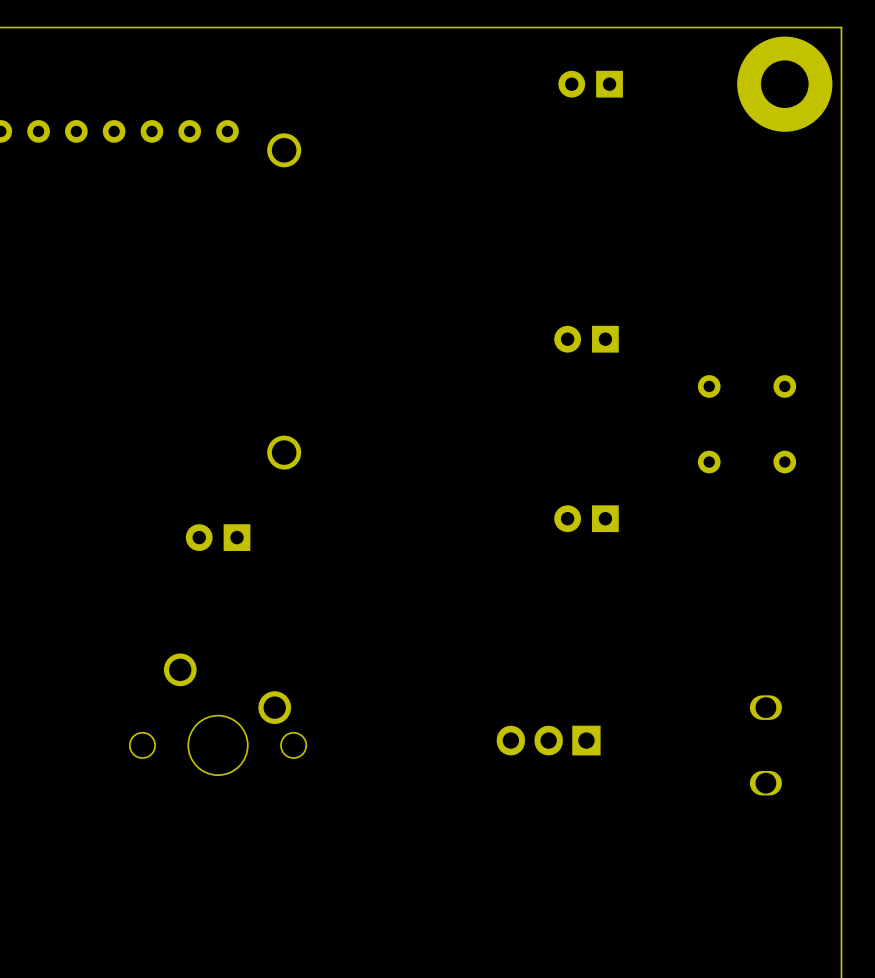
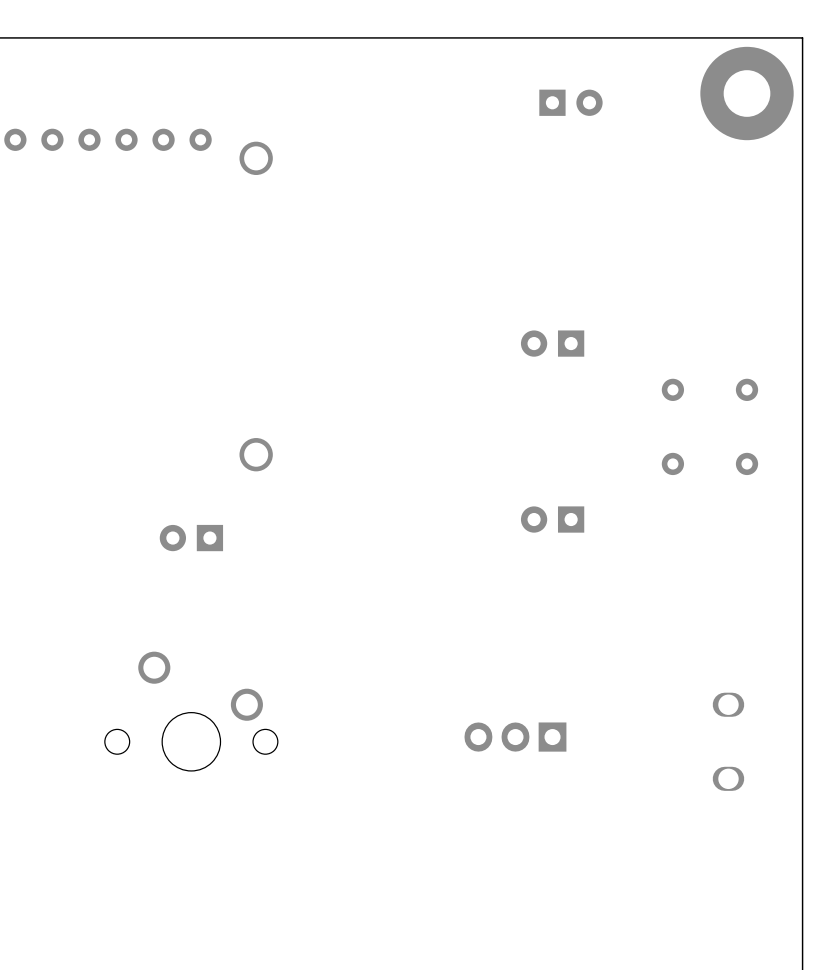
part rotation: 0° (590, 84) -> 180° (570, 102)

